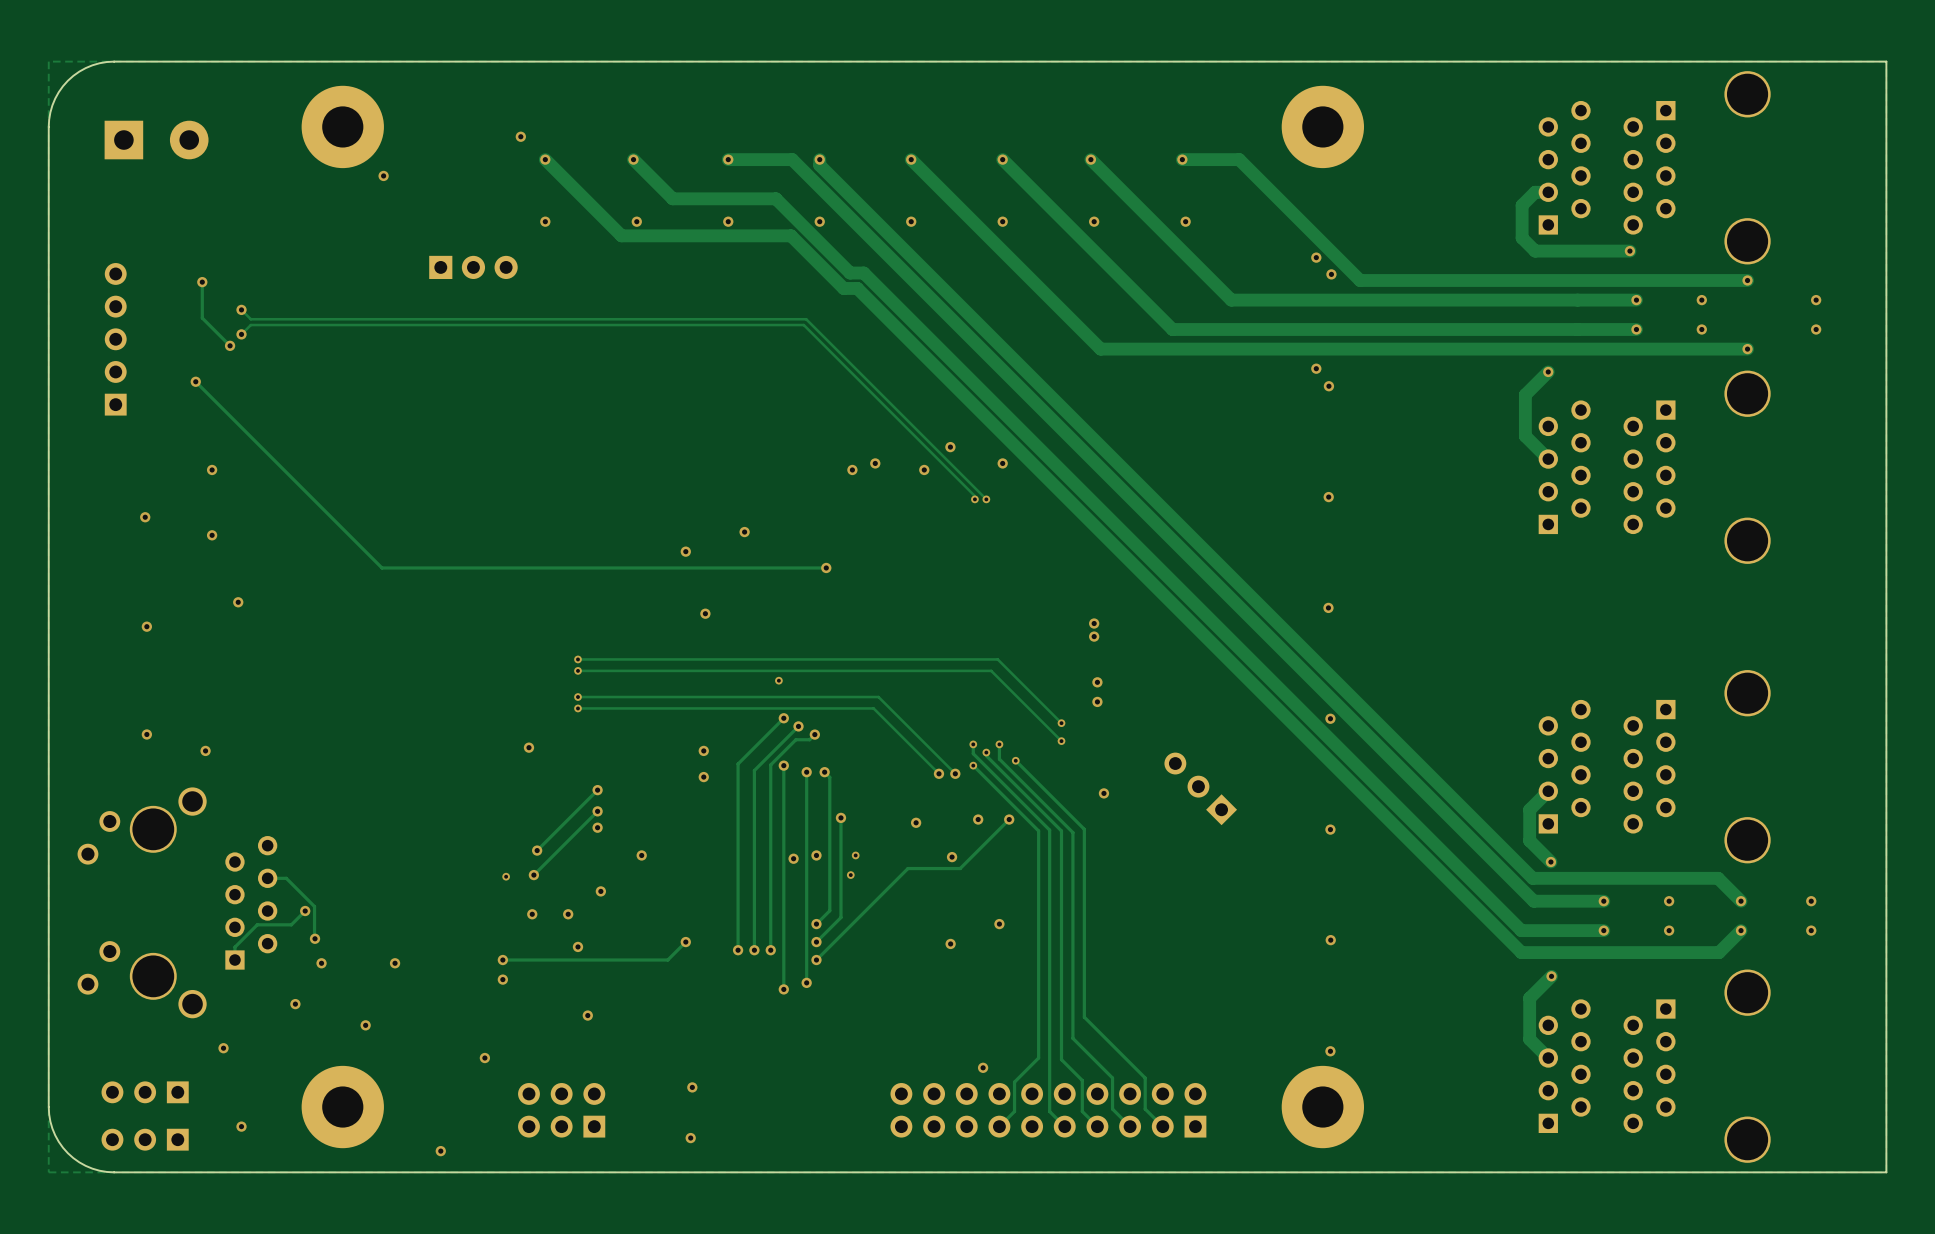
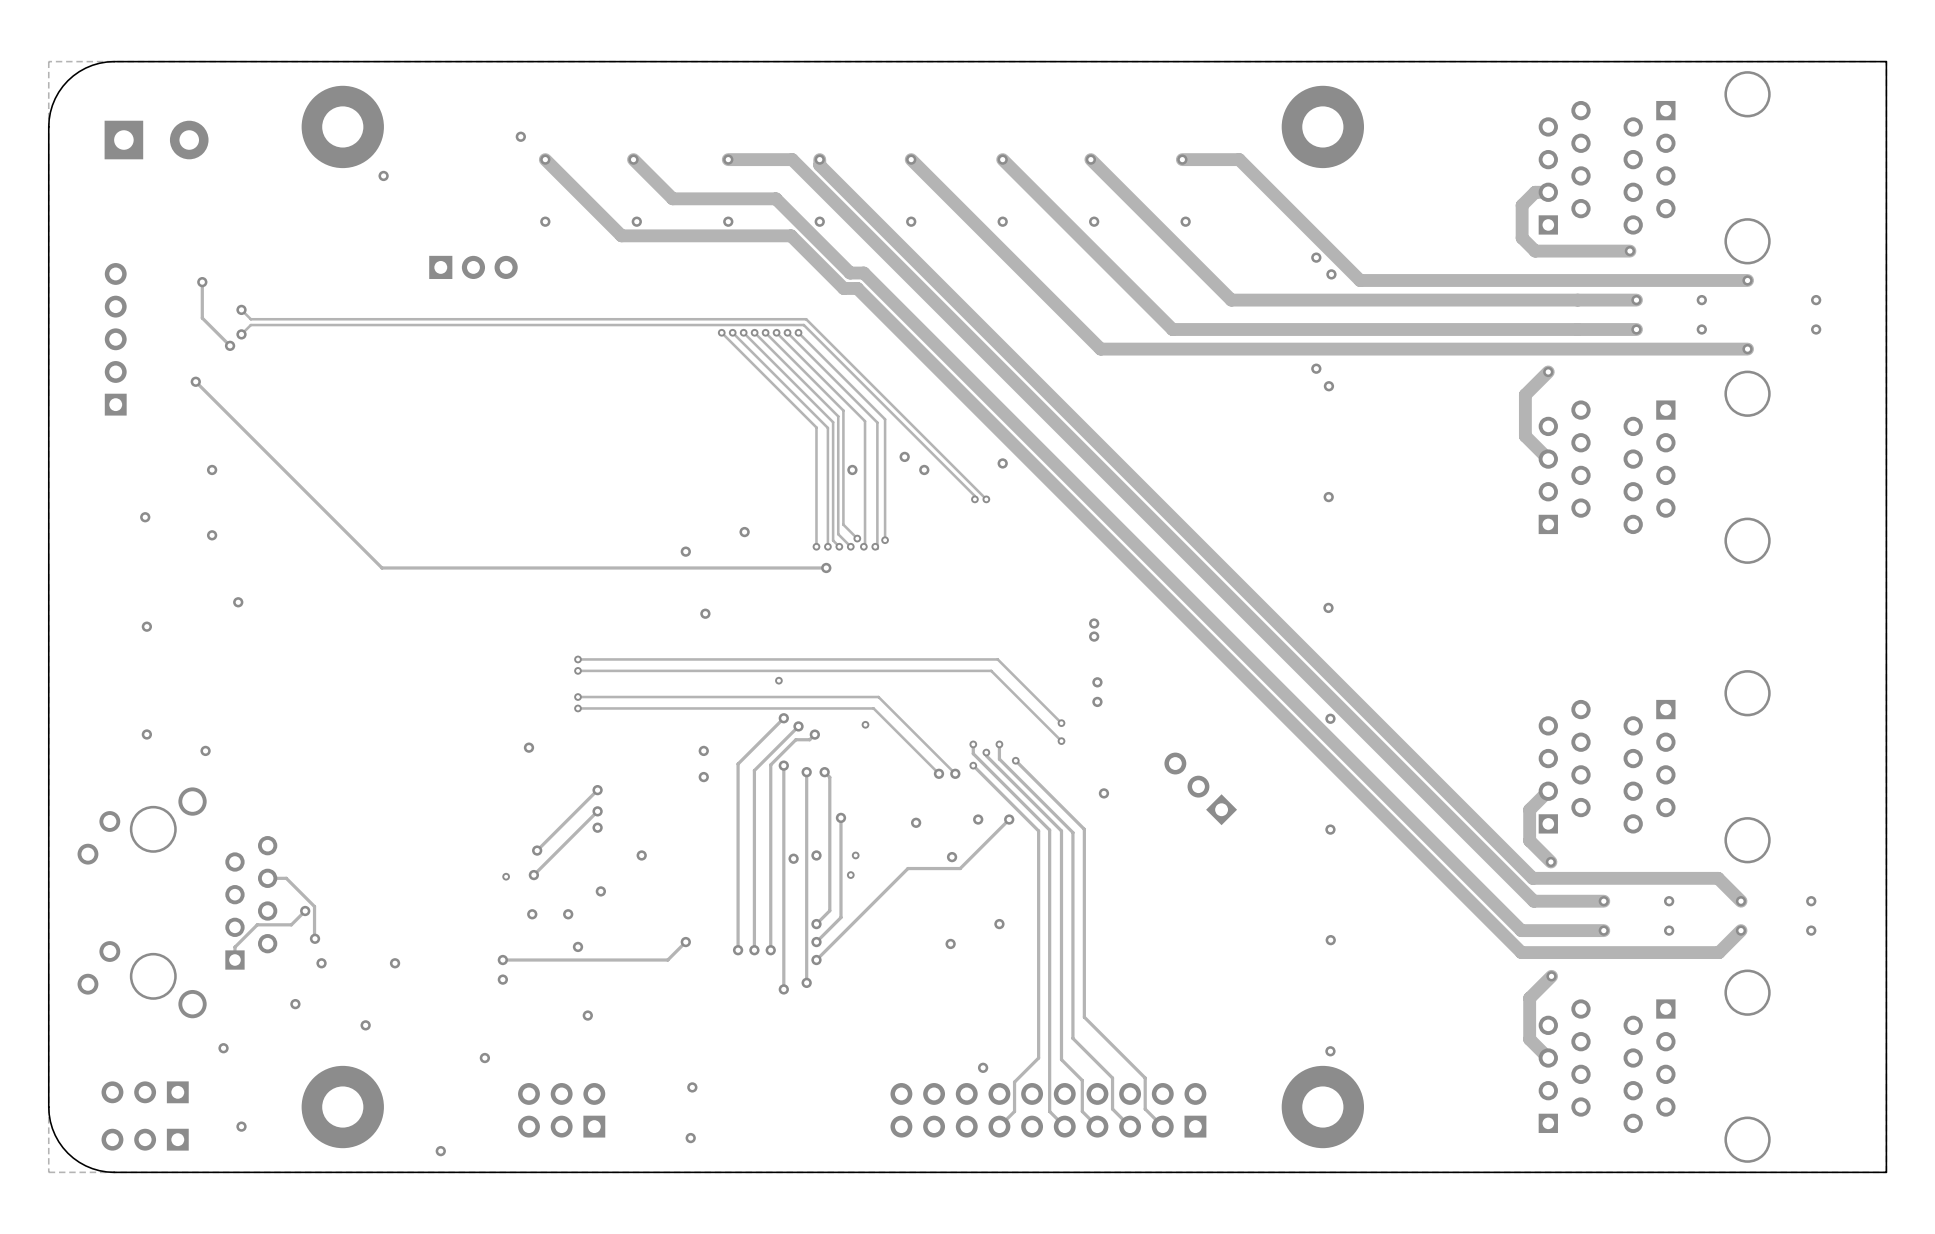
track: none -> (721, 332) (816, 427) (816, 546)
via: none -> (721, 332)
track: none -> (732, 332) (827, 427) (827, 546)
via: none -> (732, 332)
track: none -> (743, 332) (833, 422) (833, 540) (839, 546)
via: none -> (743, 332)
track: none -> (754, 332) (838, 416) (838, 534) (850, 546)
via: none -> (754, 332)
track: none -> (765, 332) (843, 410) (843, 524) (857, 538)
via: none -> (765, 332)
track: none -> (776, 332) (865, 421) (863, 546)
via: none -> (776, 332)
track: none -> (787, 332) (877, 422) (877, 548) (875, 546)
via: none -> (787, 332)
track: none -> (798, 332) (885, 419) (885, 540)
via: none -> (798, 332)
via: (950, 447) -> none
via: none -> (904, 456)
via: (875, 463) -> none
via: none -> (857, 538)
via: none -> (885, 540)
via: none -> (816, 546)
via: none -> (827, 546)
via: none -> (839, 546)
via: none -> (850, 546)
via: none -> (863, 546)
via: none -> (875, 546)
via: none -> (865, 724)

